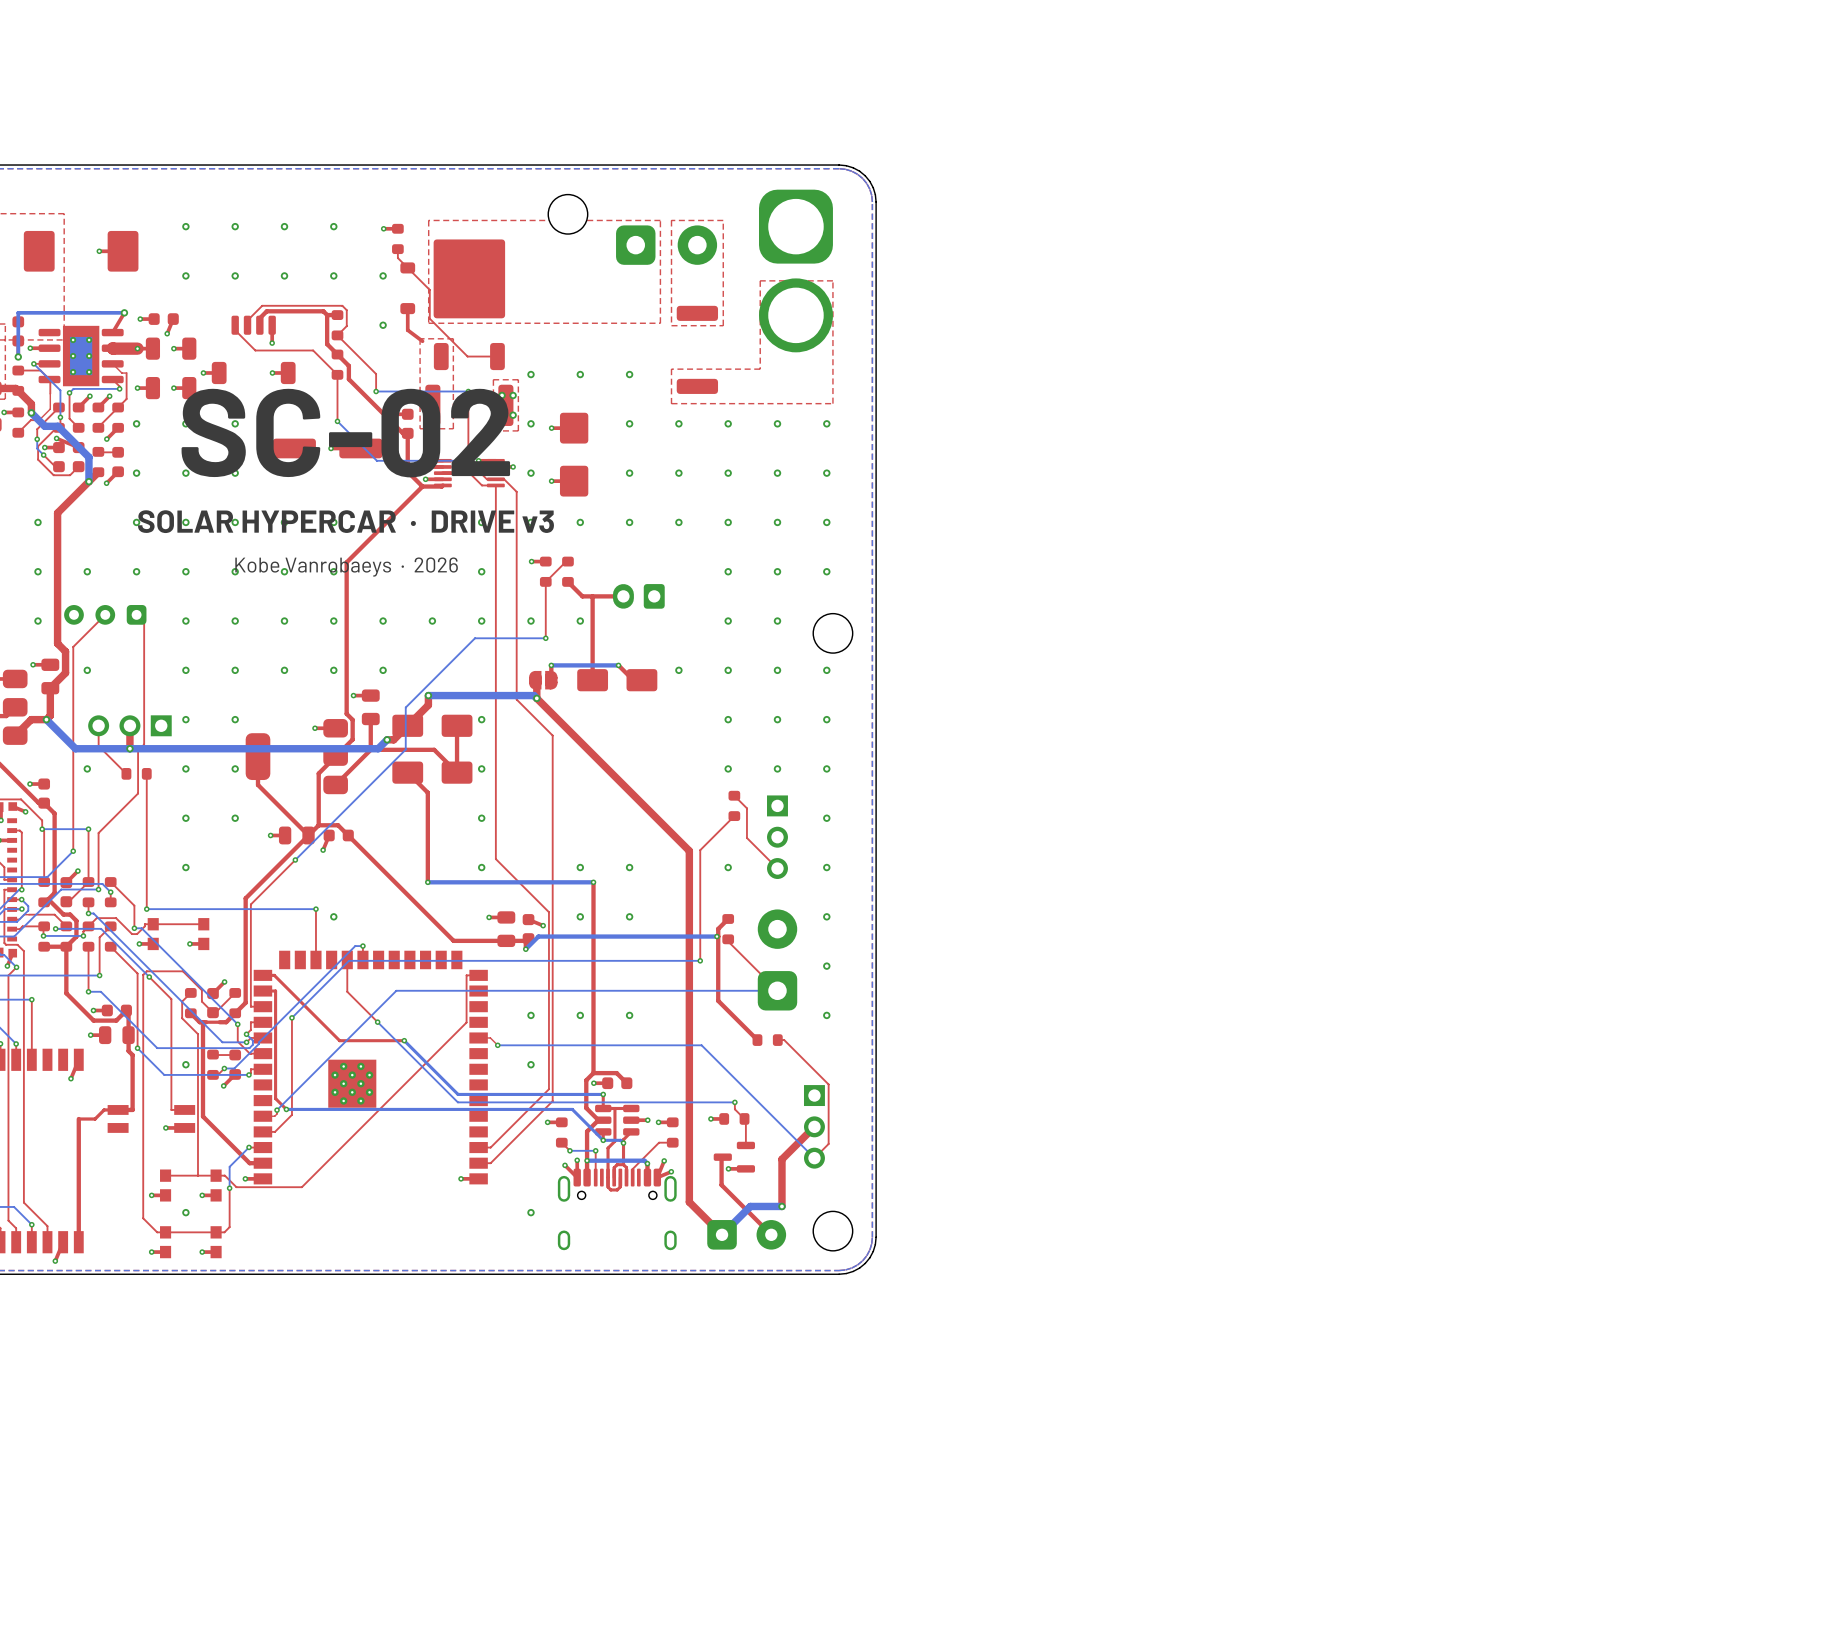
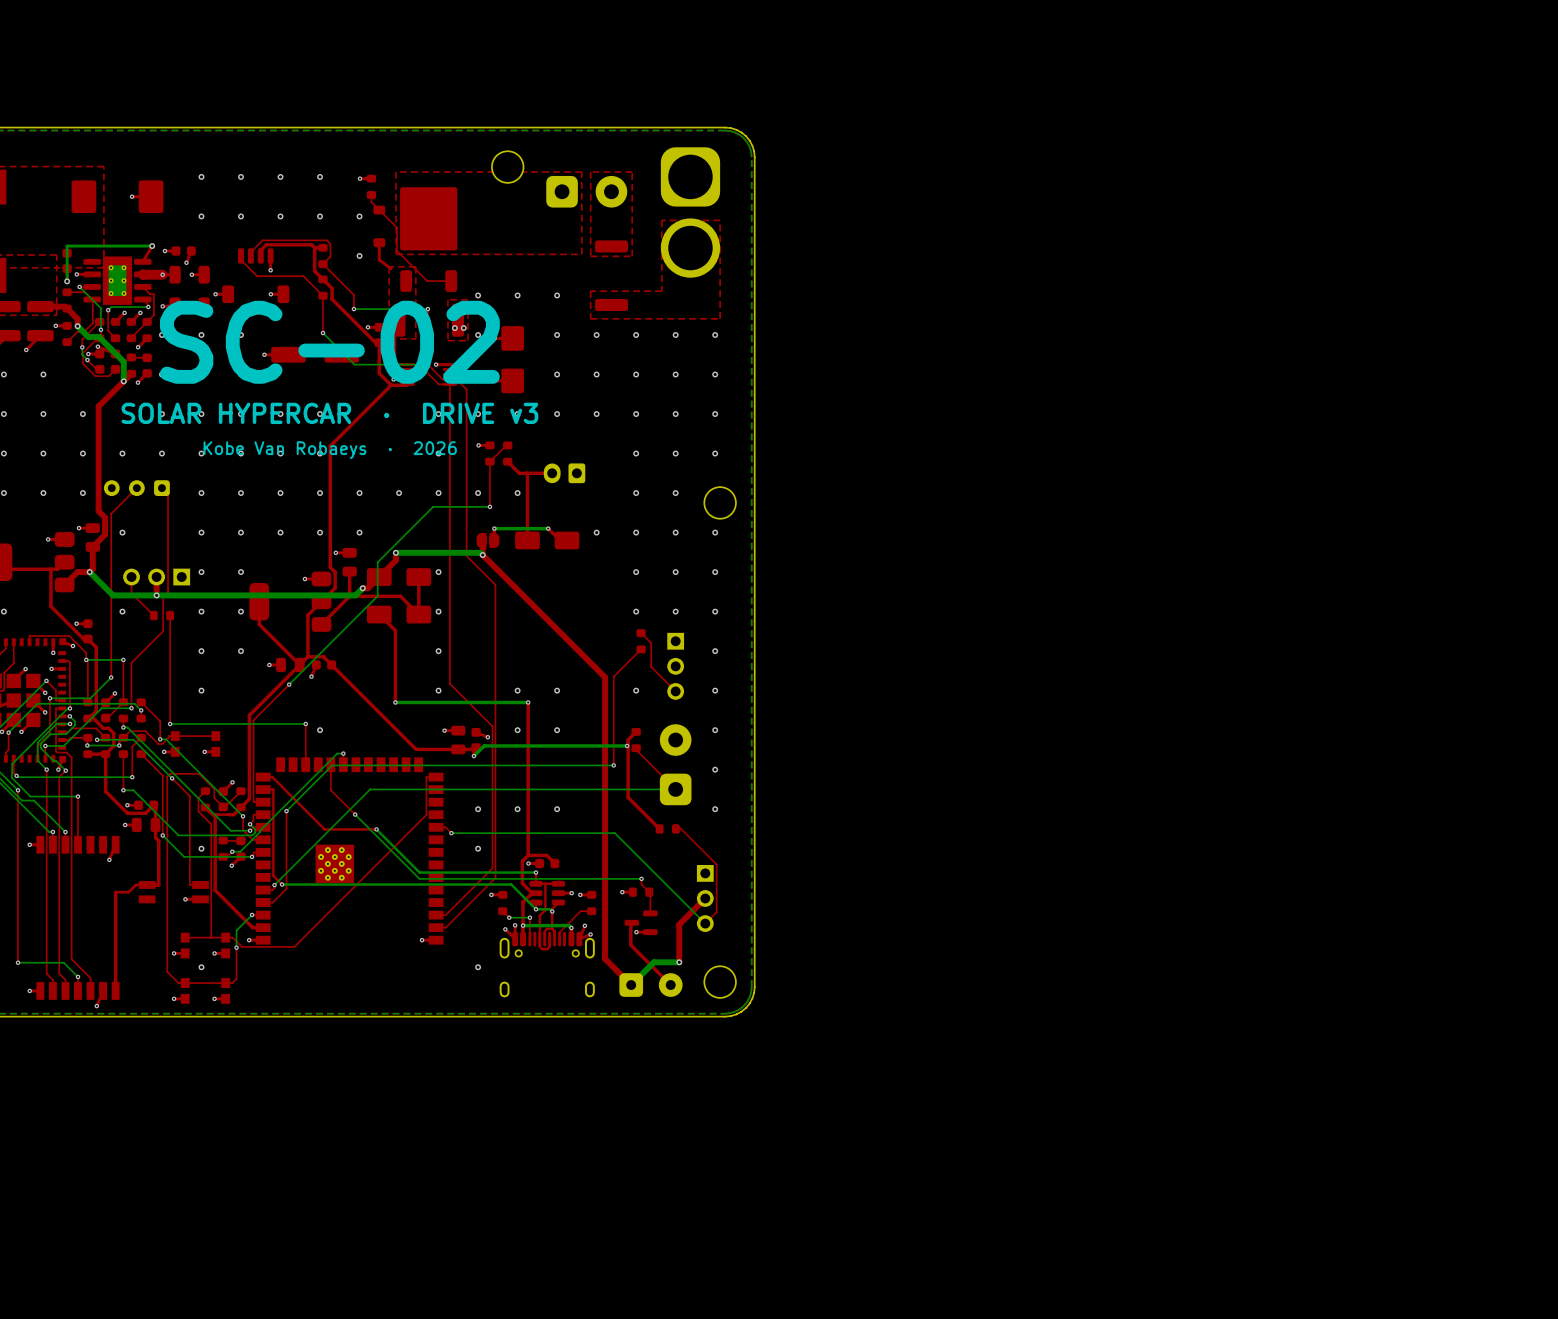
text: Kobe Vanrobaeys · 2026 (346, 567) -> Kobe Van Robaeys · 2026 (330, 450)

